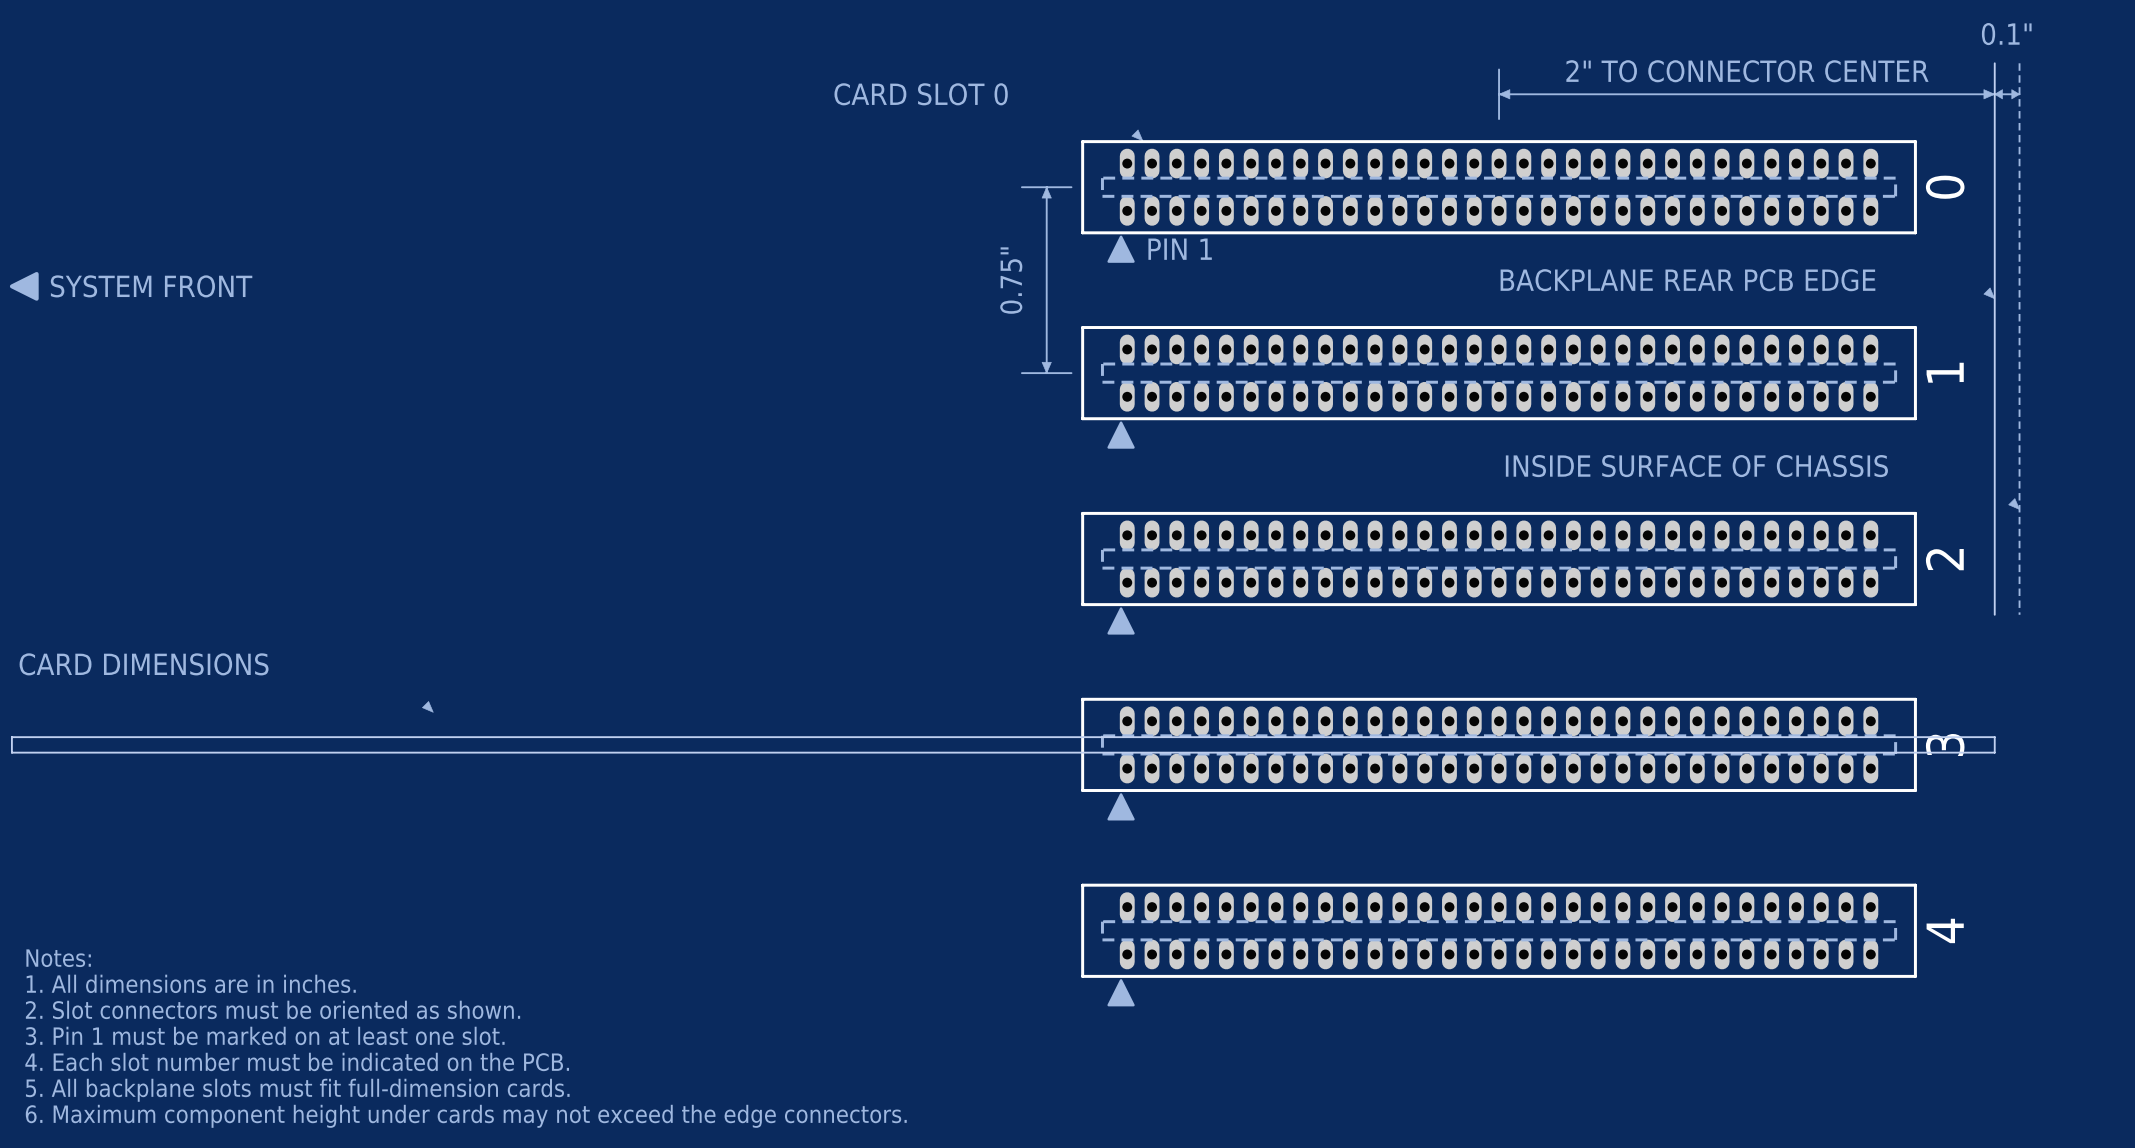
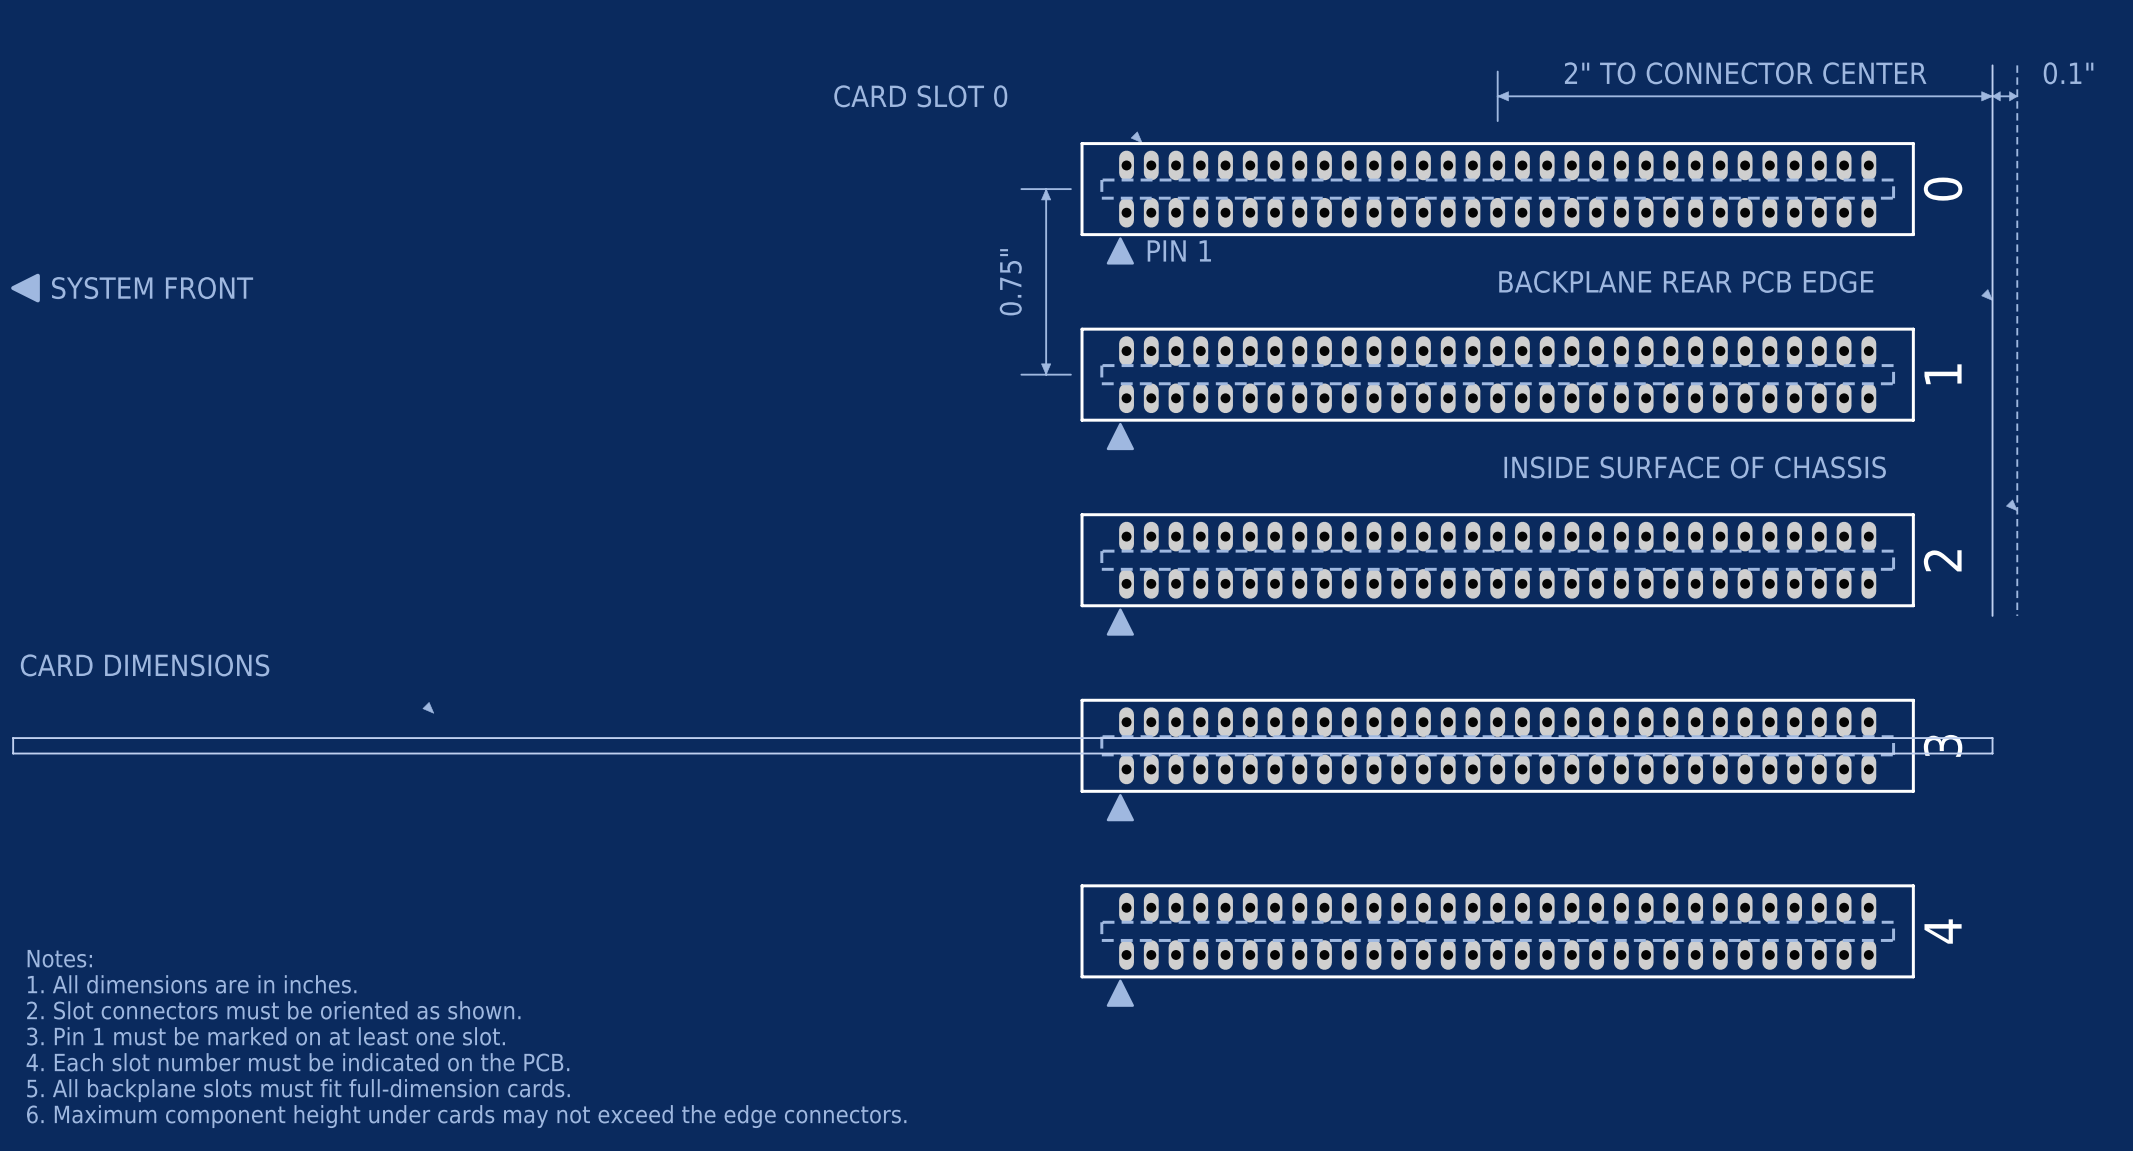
text position: 0.1" (2006, 34) -> 0.1" (2068, 73)

